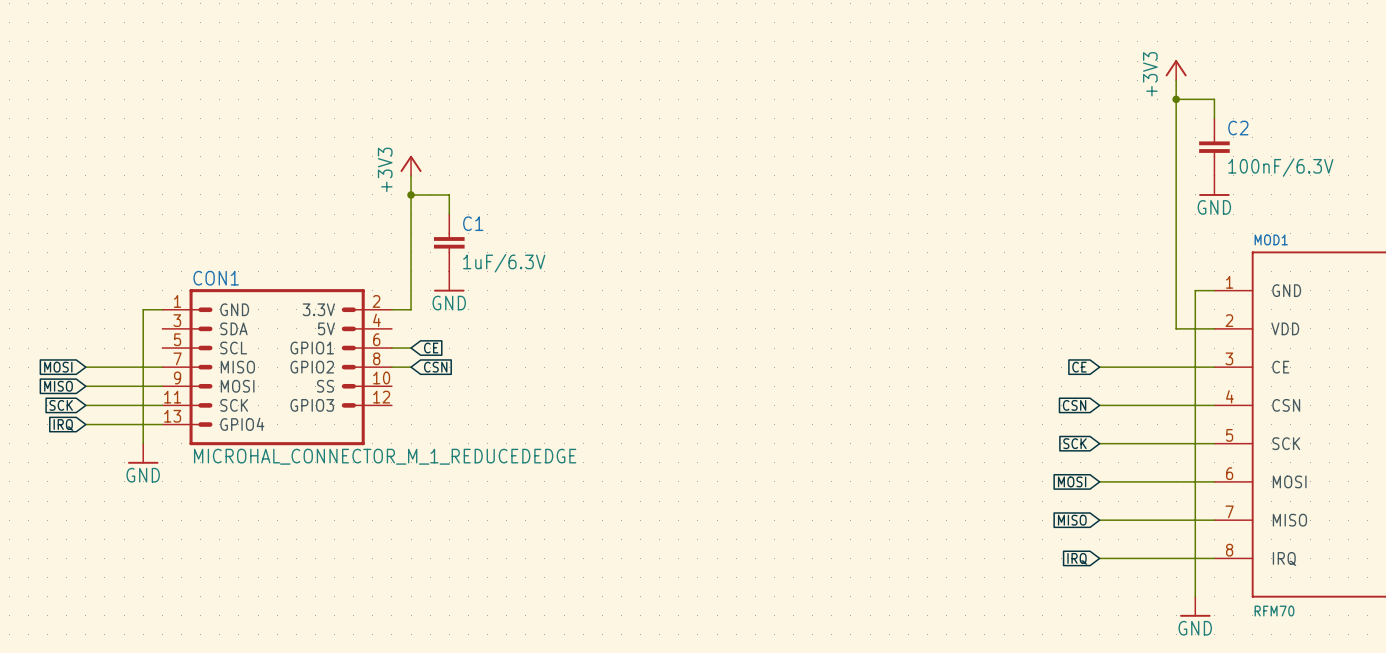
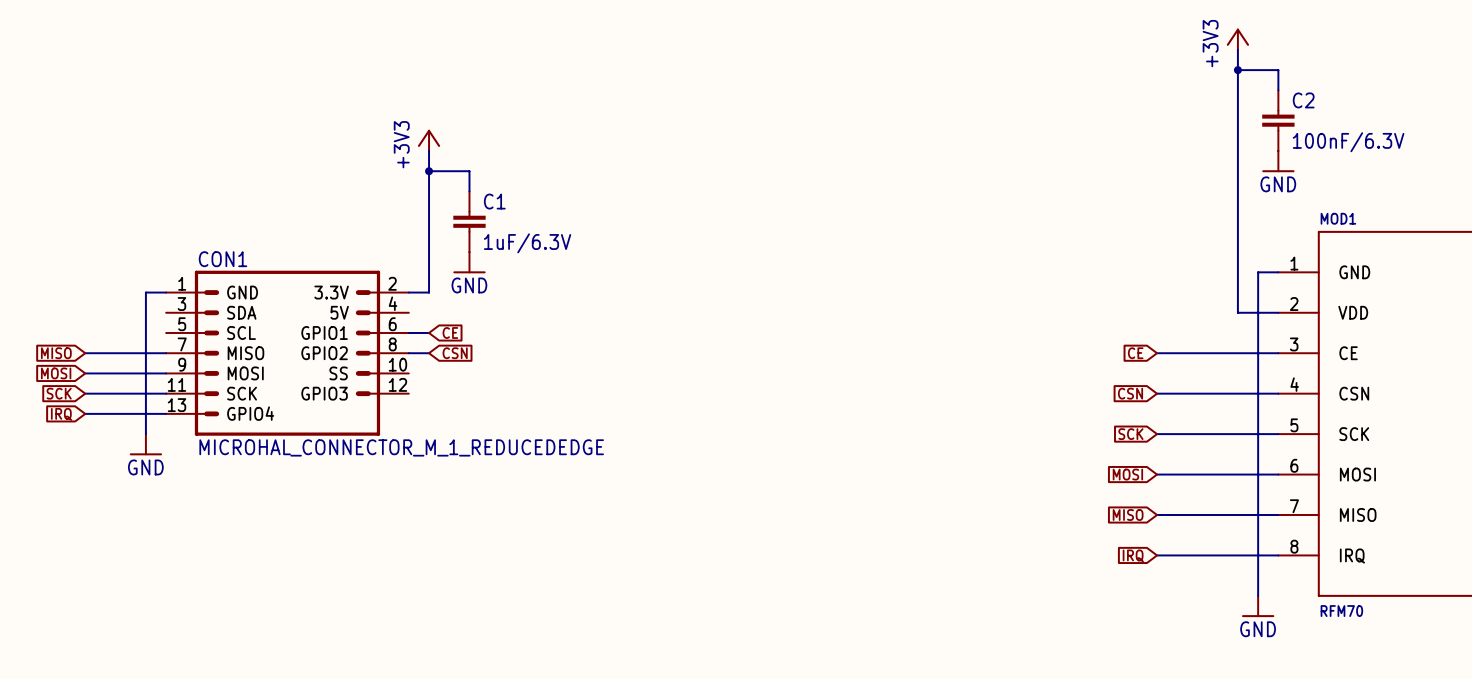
global label: MOSI (58, 367) -> MISO (56, 353)
global label: MISO (58, 386) -> MOSI (56, 373)

